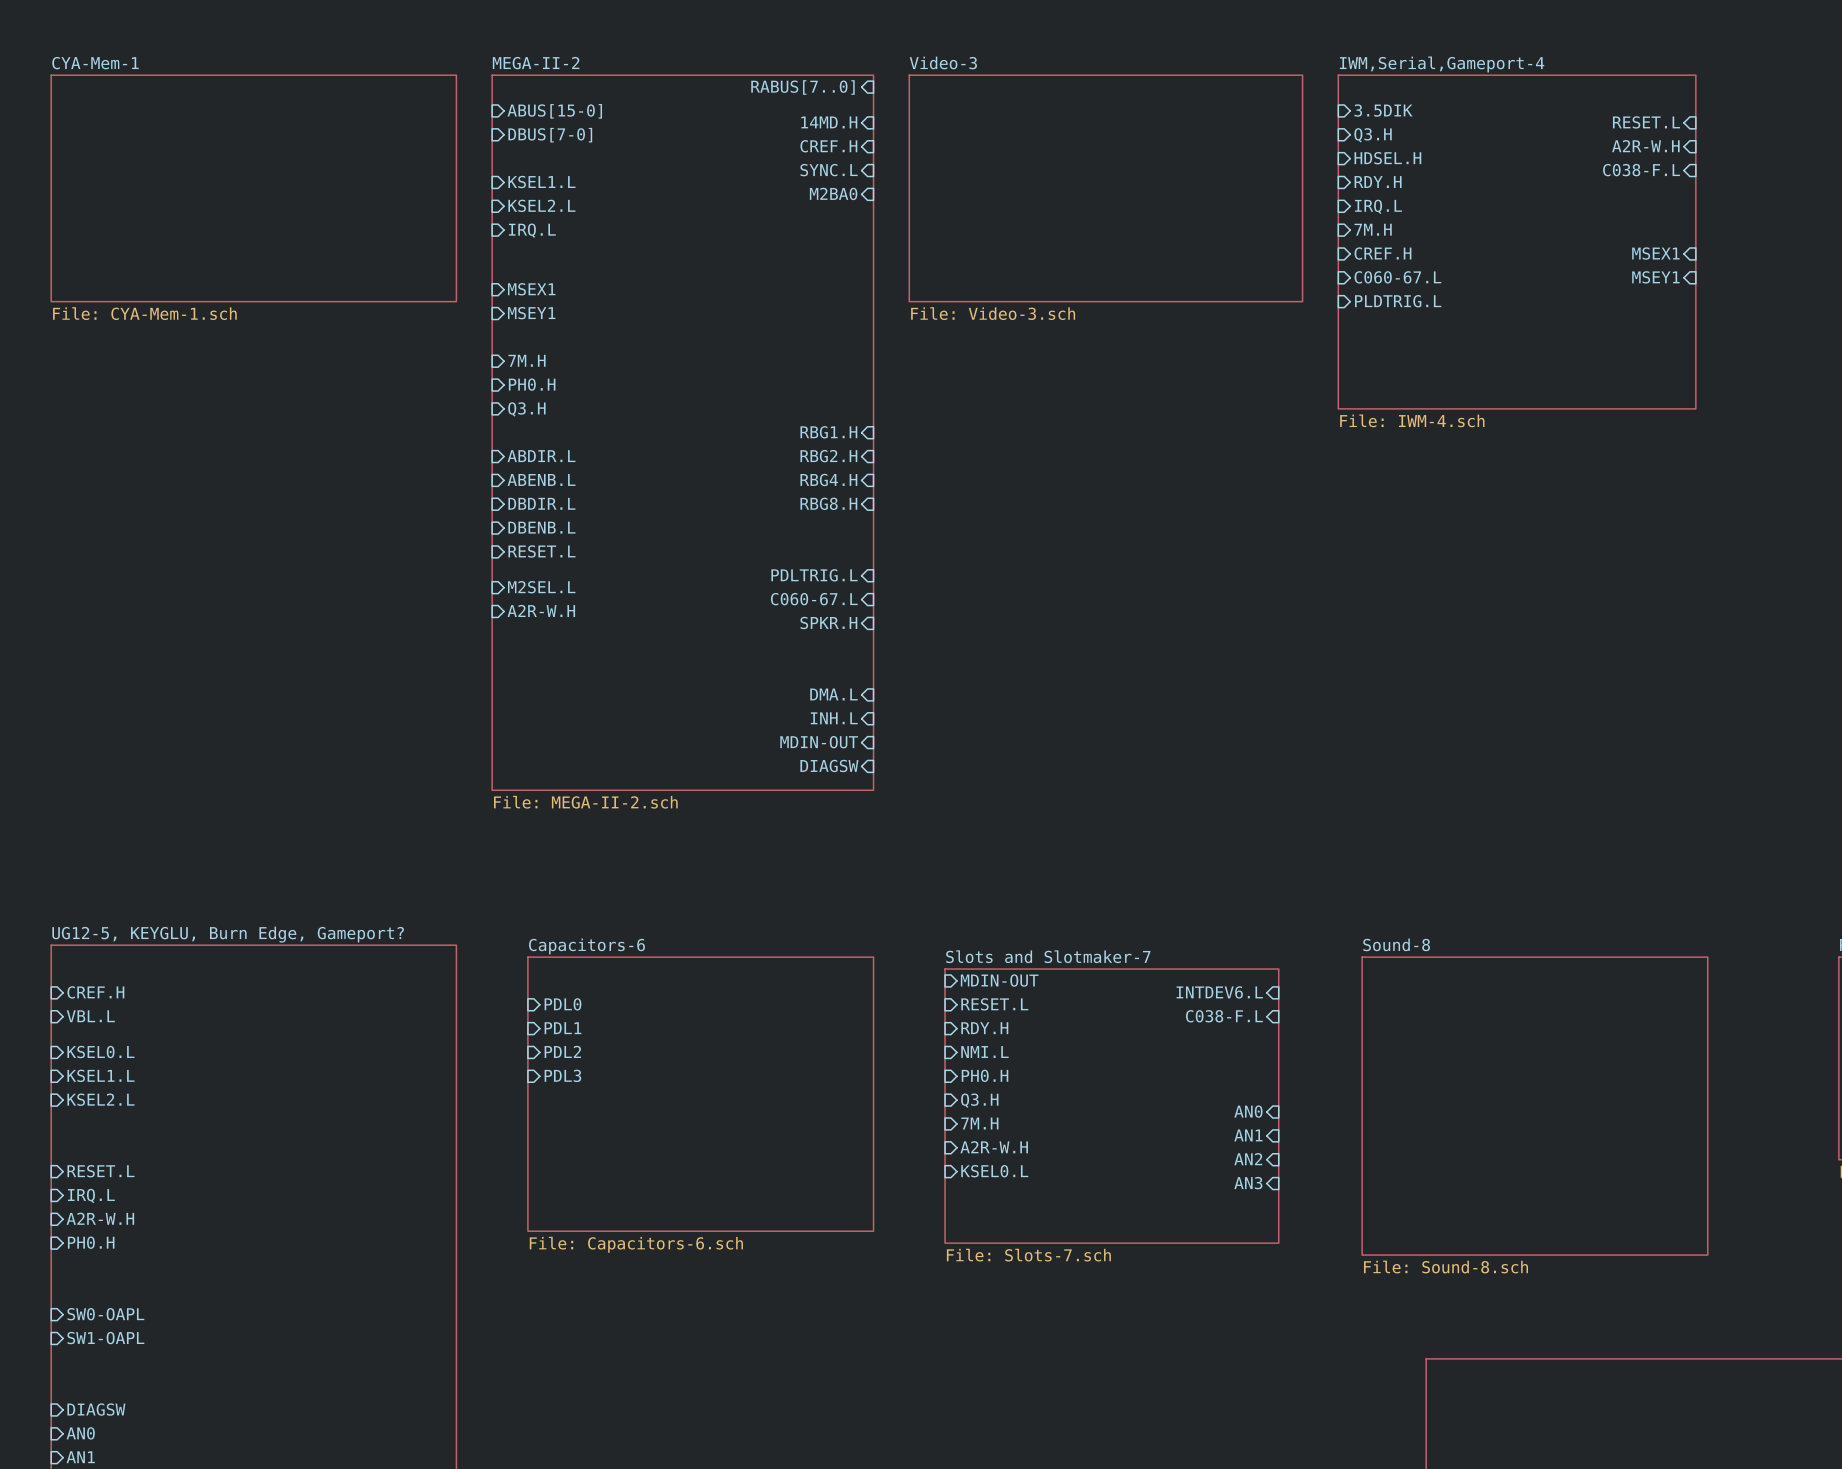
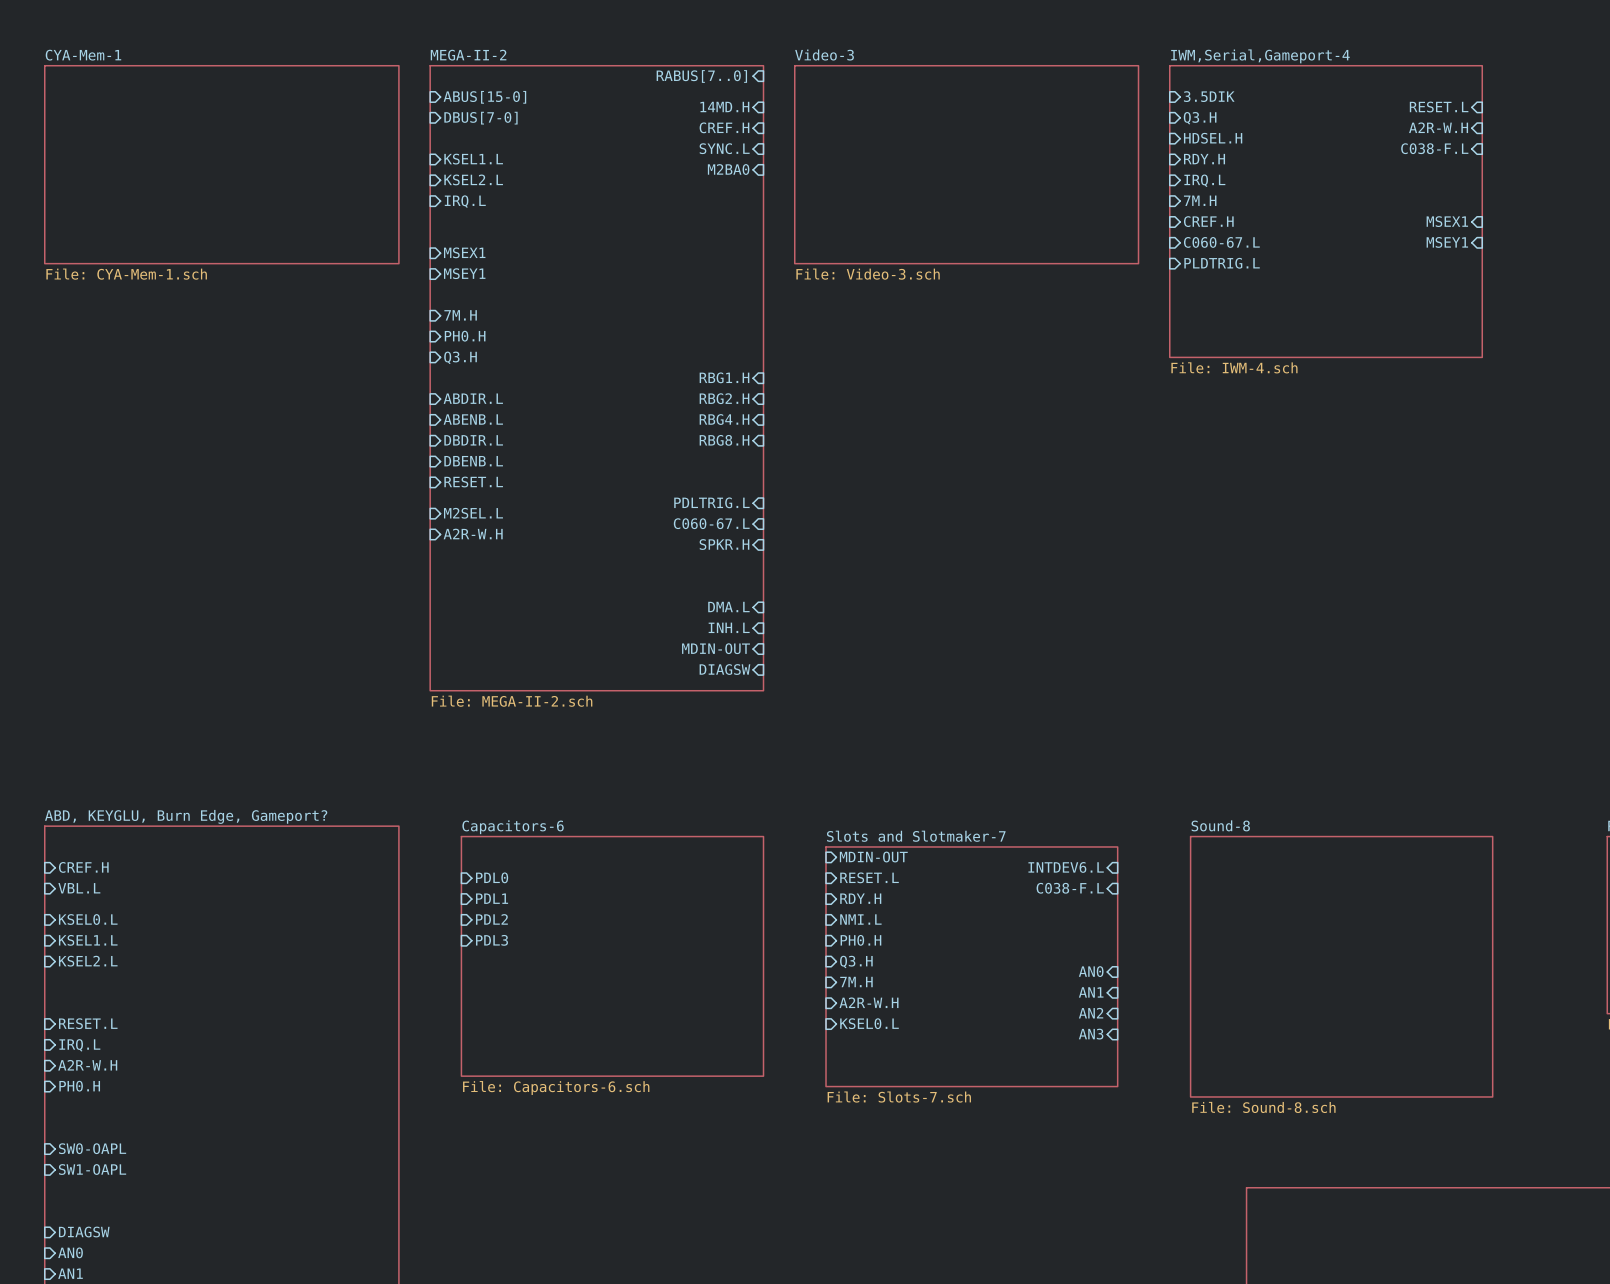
sheet UG12-5, KEYGLU, Burn Edge, Gameport? name: UG12-5, KEYGLU, Burn Edge, Gameport? (228, 934) -> ABD, KEYGLU, Burn Edge, Gameport? (186, 816)

